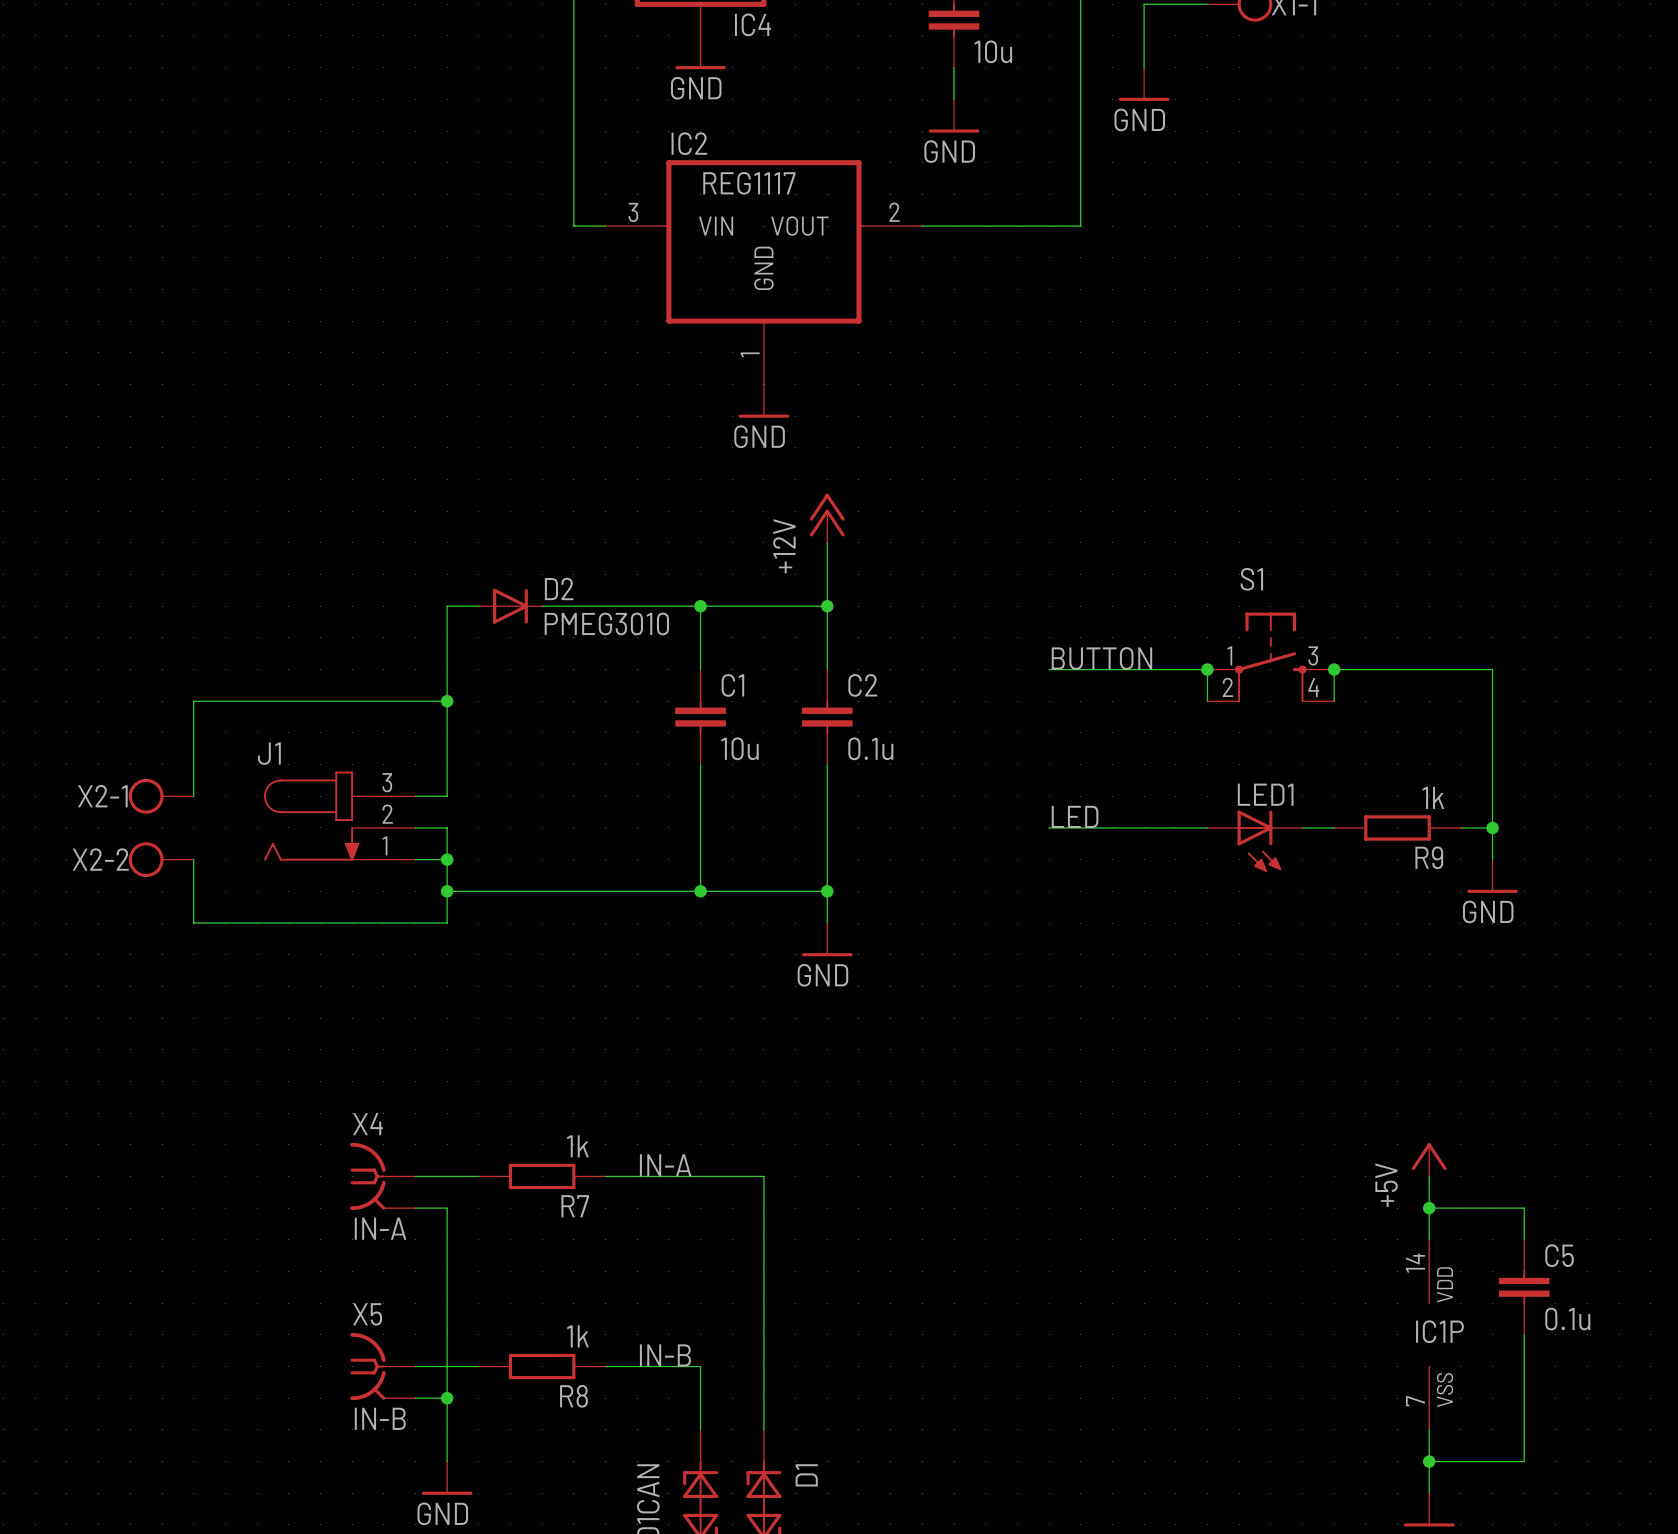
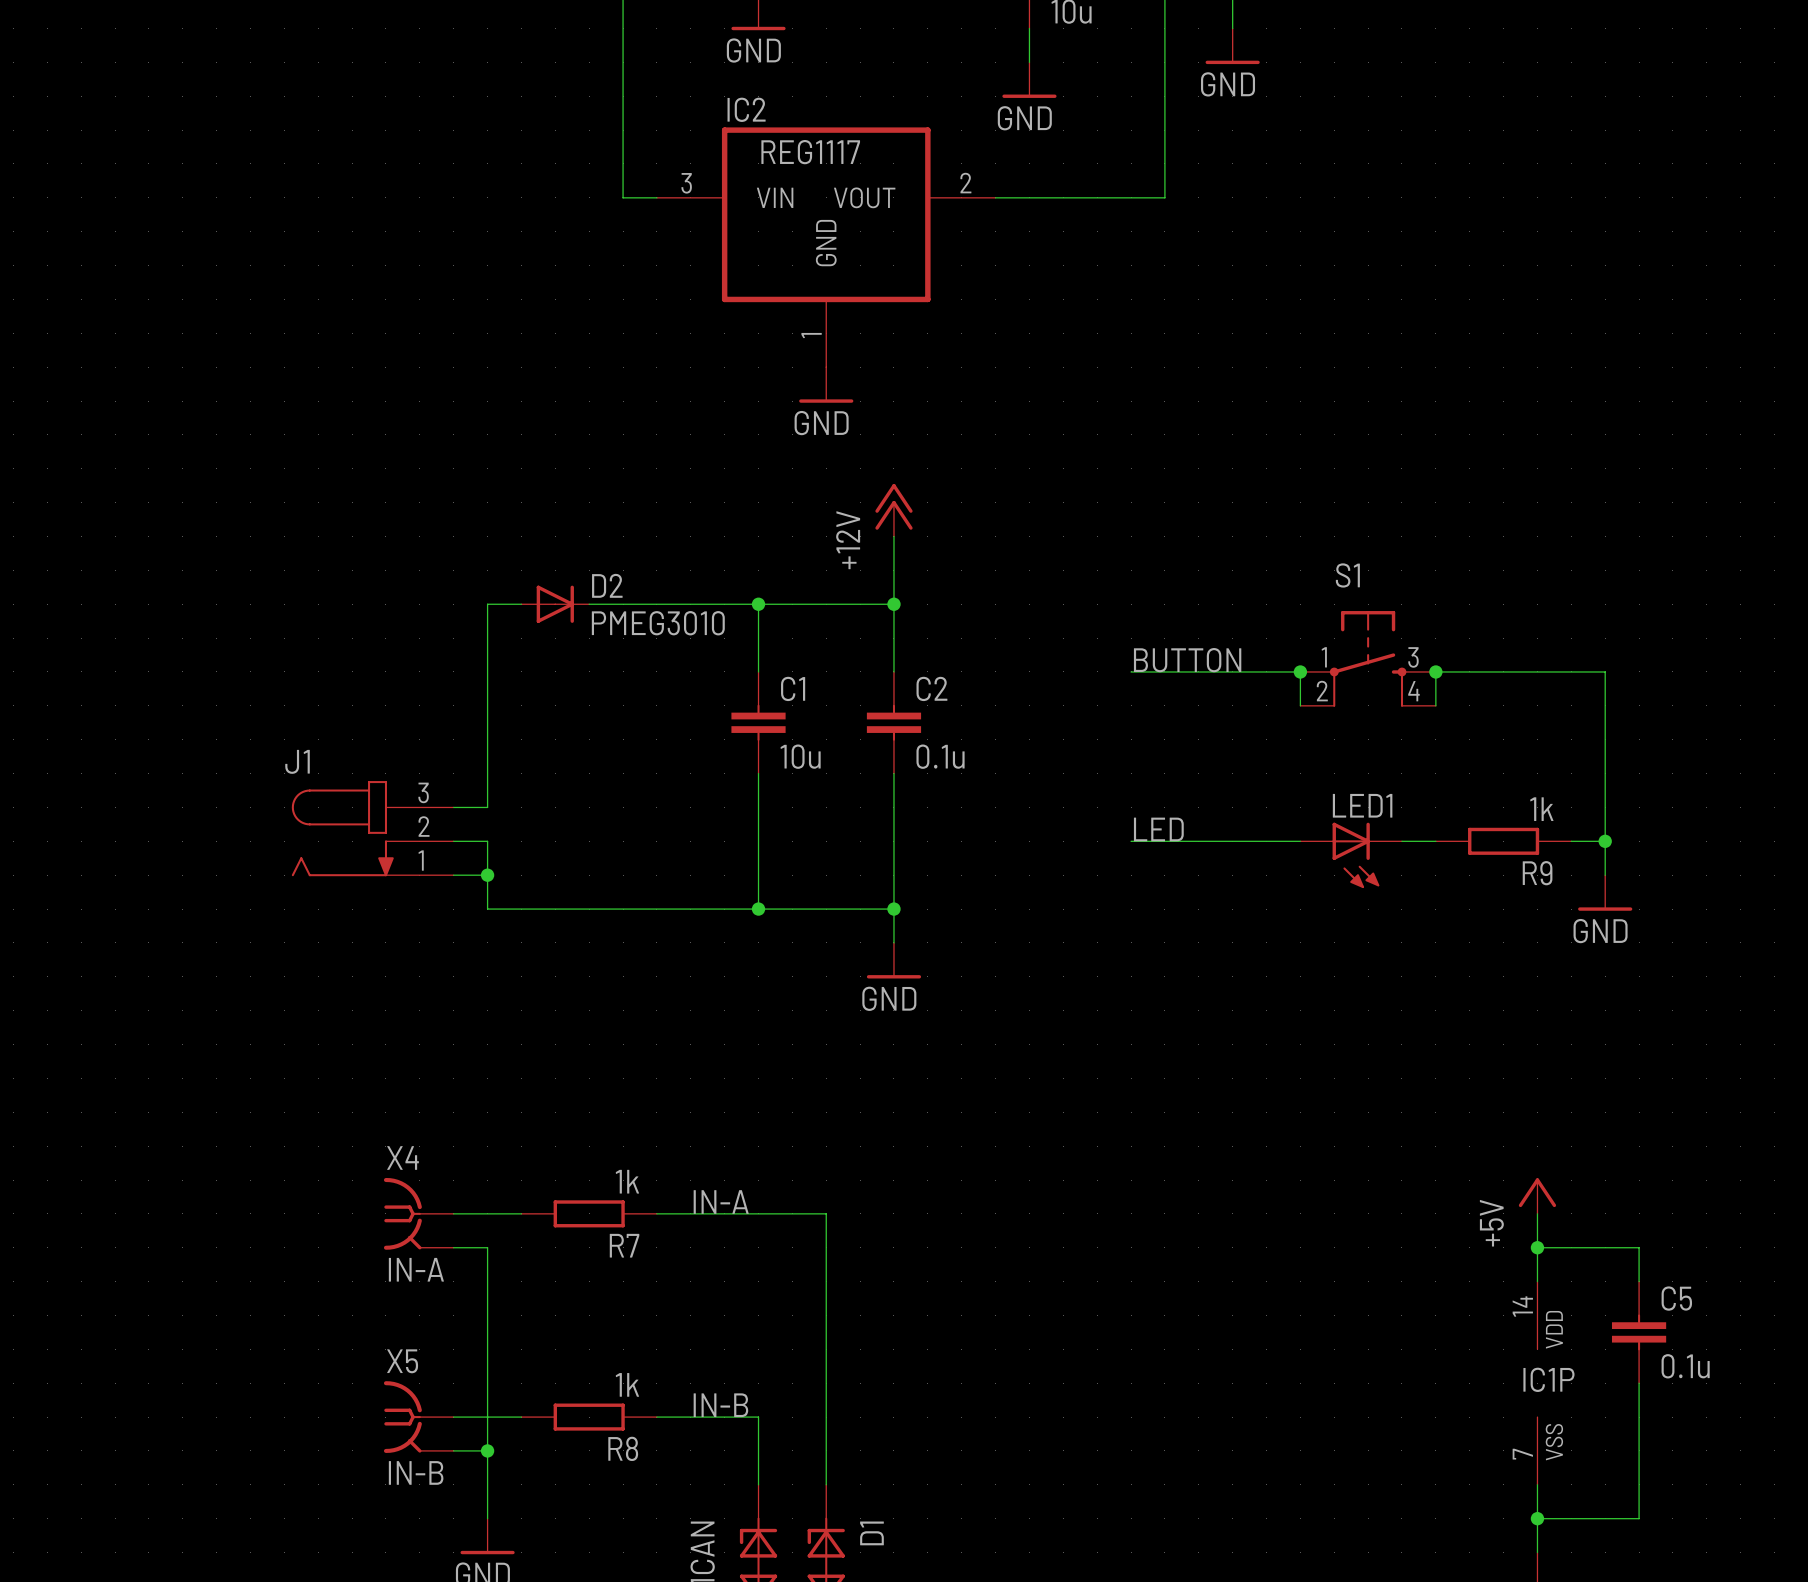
wire: (447, 701) (193, 701) (193, 796) -> none
junction: (447, 701) -> none
X2-1: (161, 796) -> none
X2-2: (161, 859) -> none
wire: (193, 859) (193, 923) (447, 923) (447, 891) -> none
junction: (447, 891) -> none

